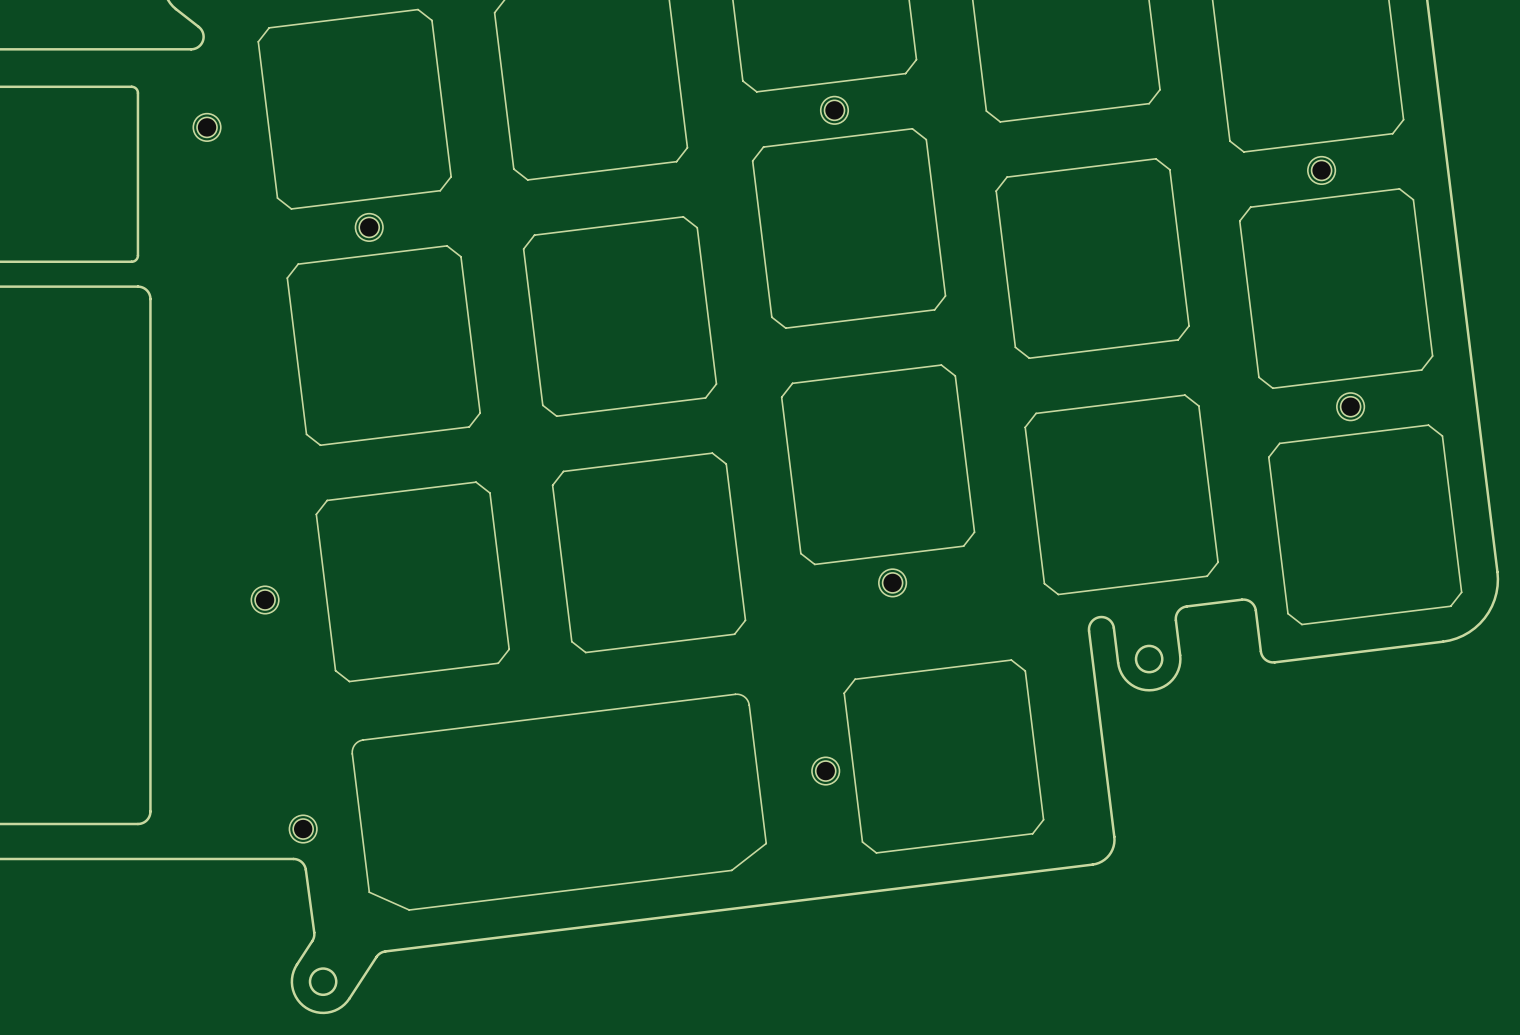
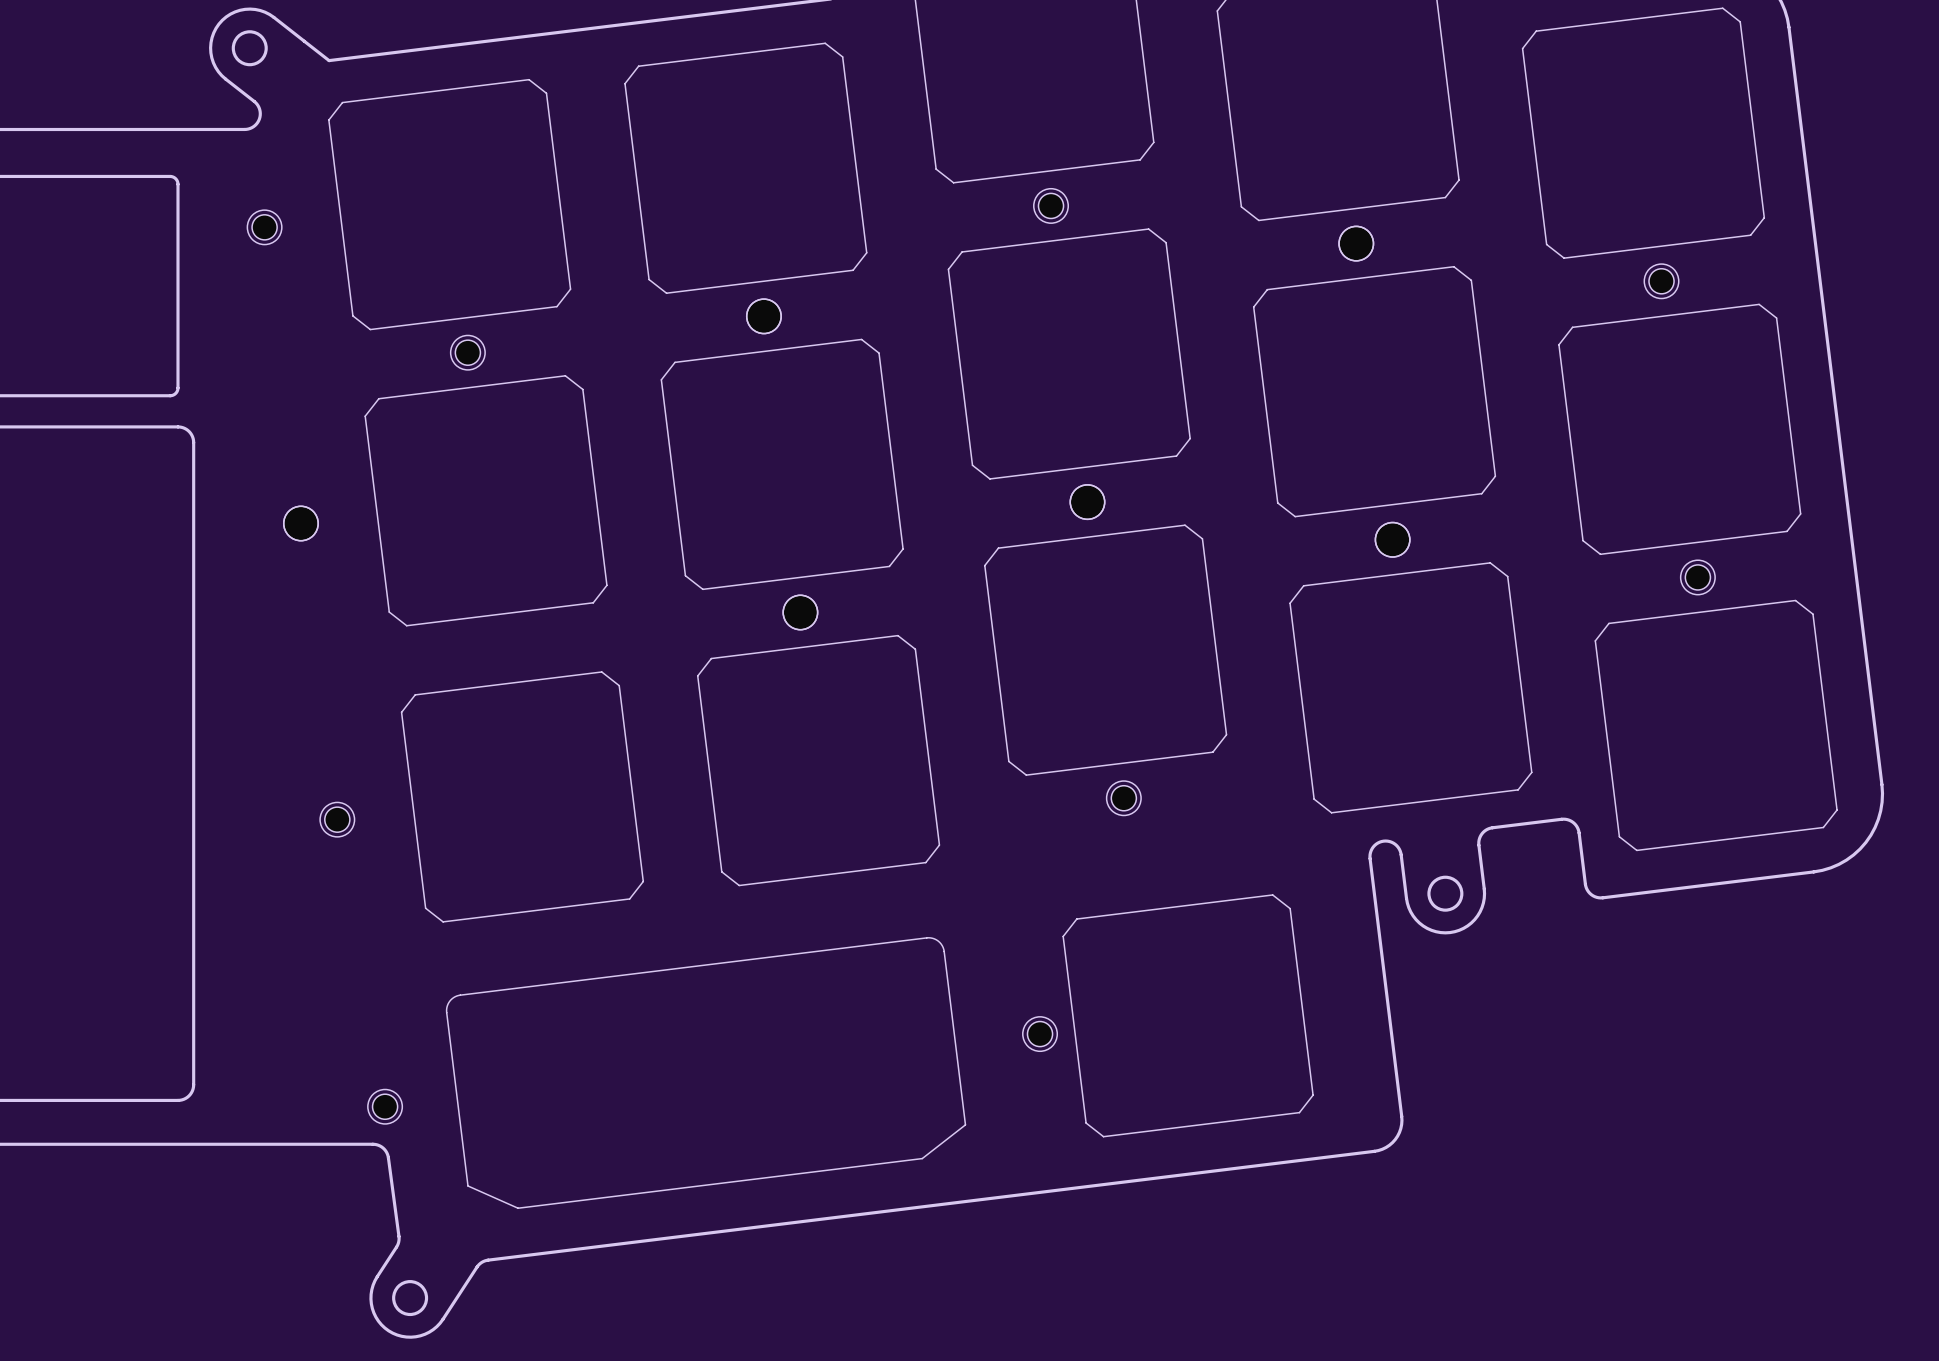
part: none -> (1356, 243)
part: none -> (763, 316)
part: none -> (1087, 502)
part: none -> (300, 523)
part: none -> (1392, 539)
part: none -> (800, 612)

